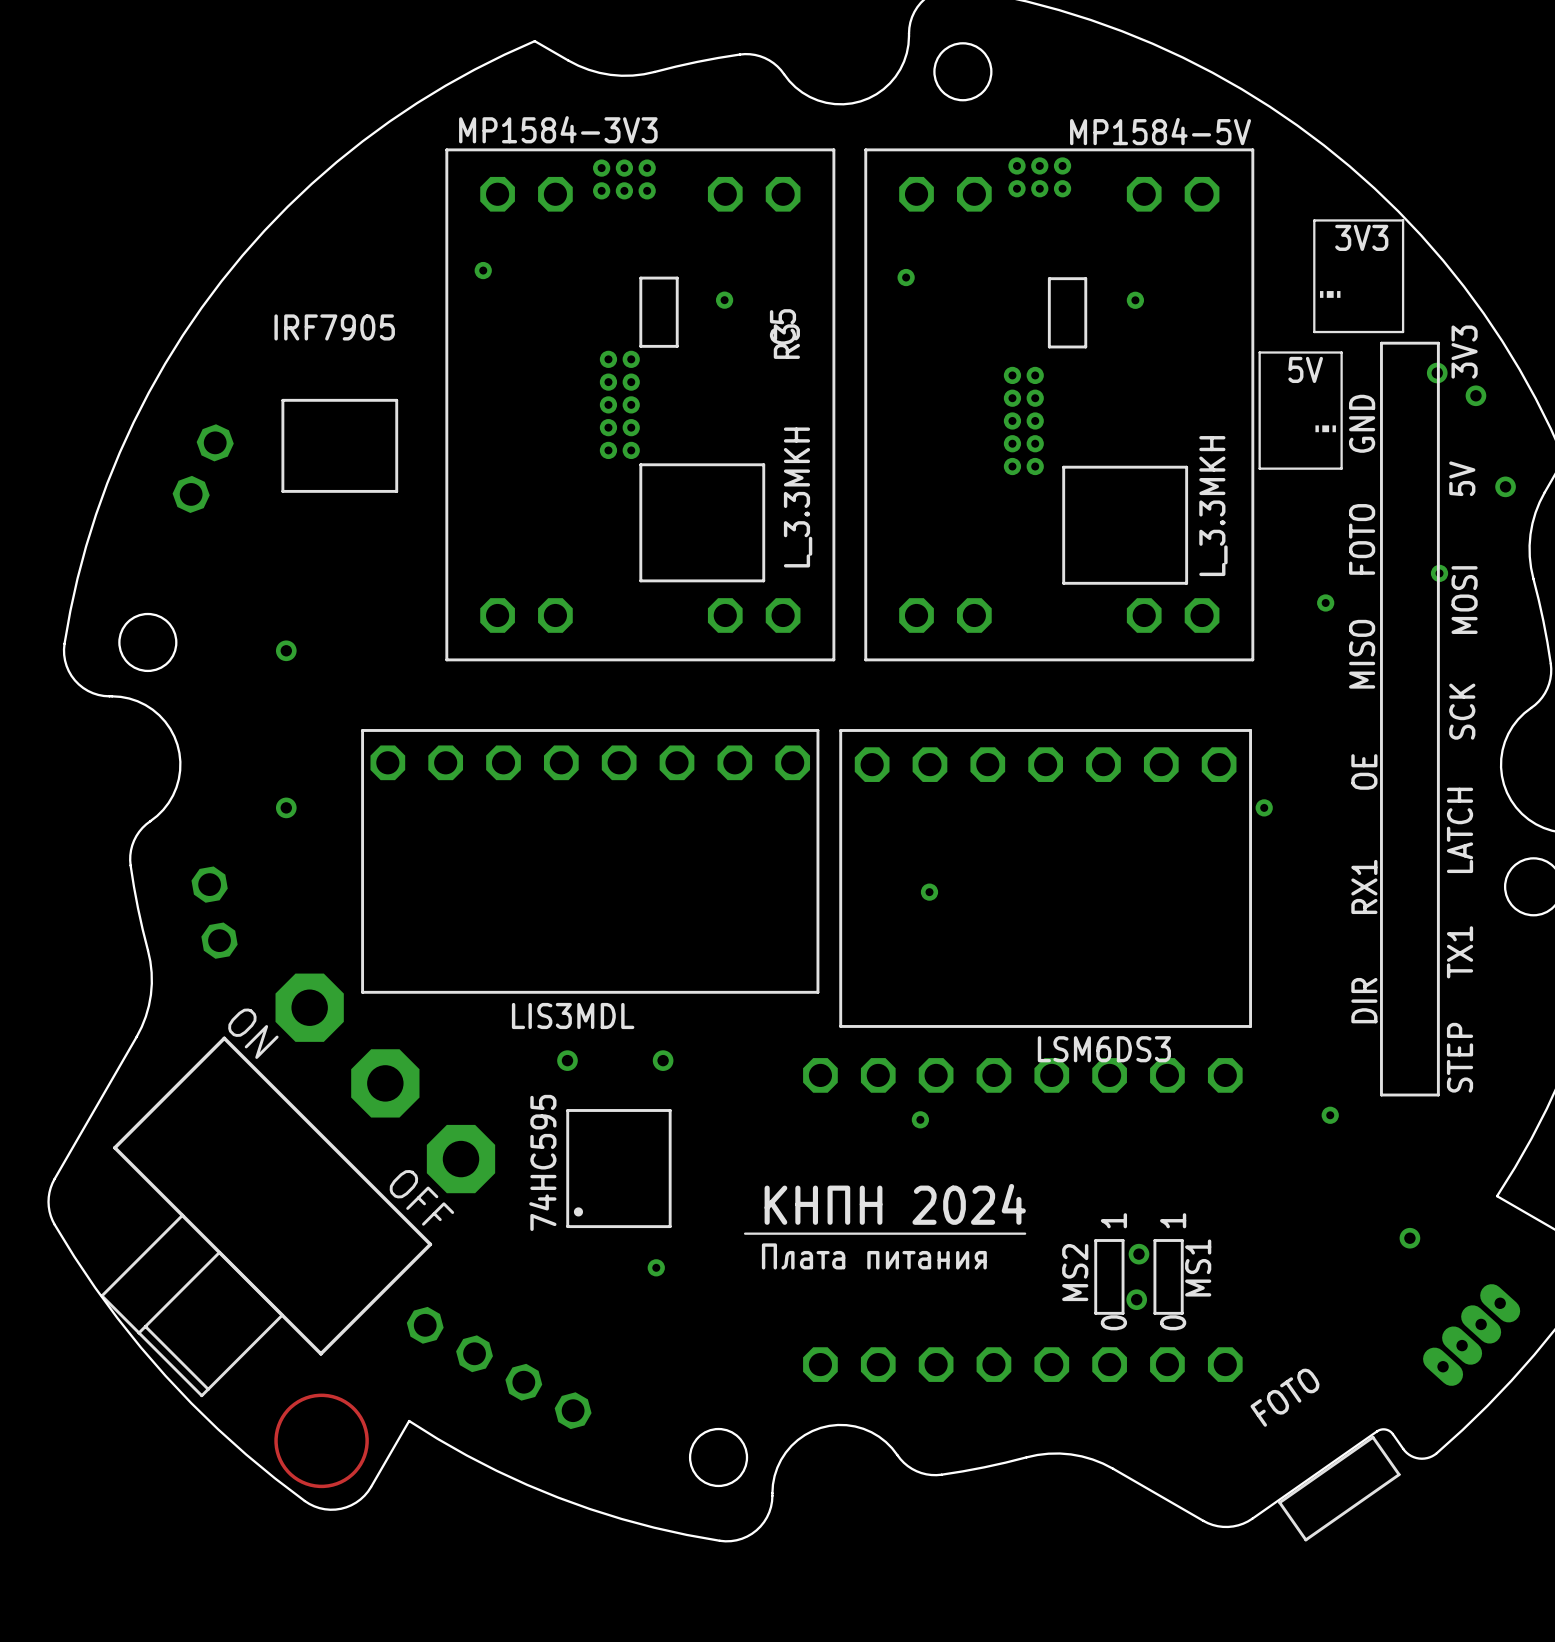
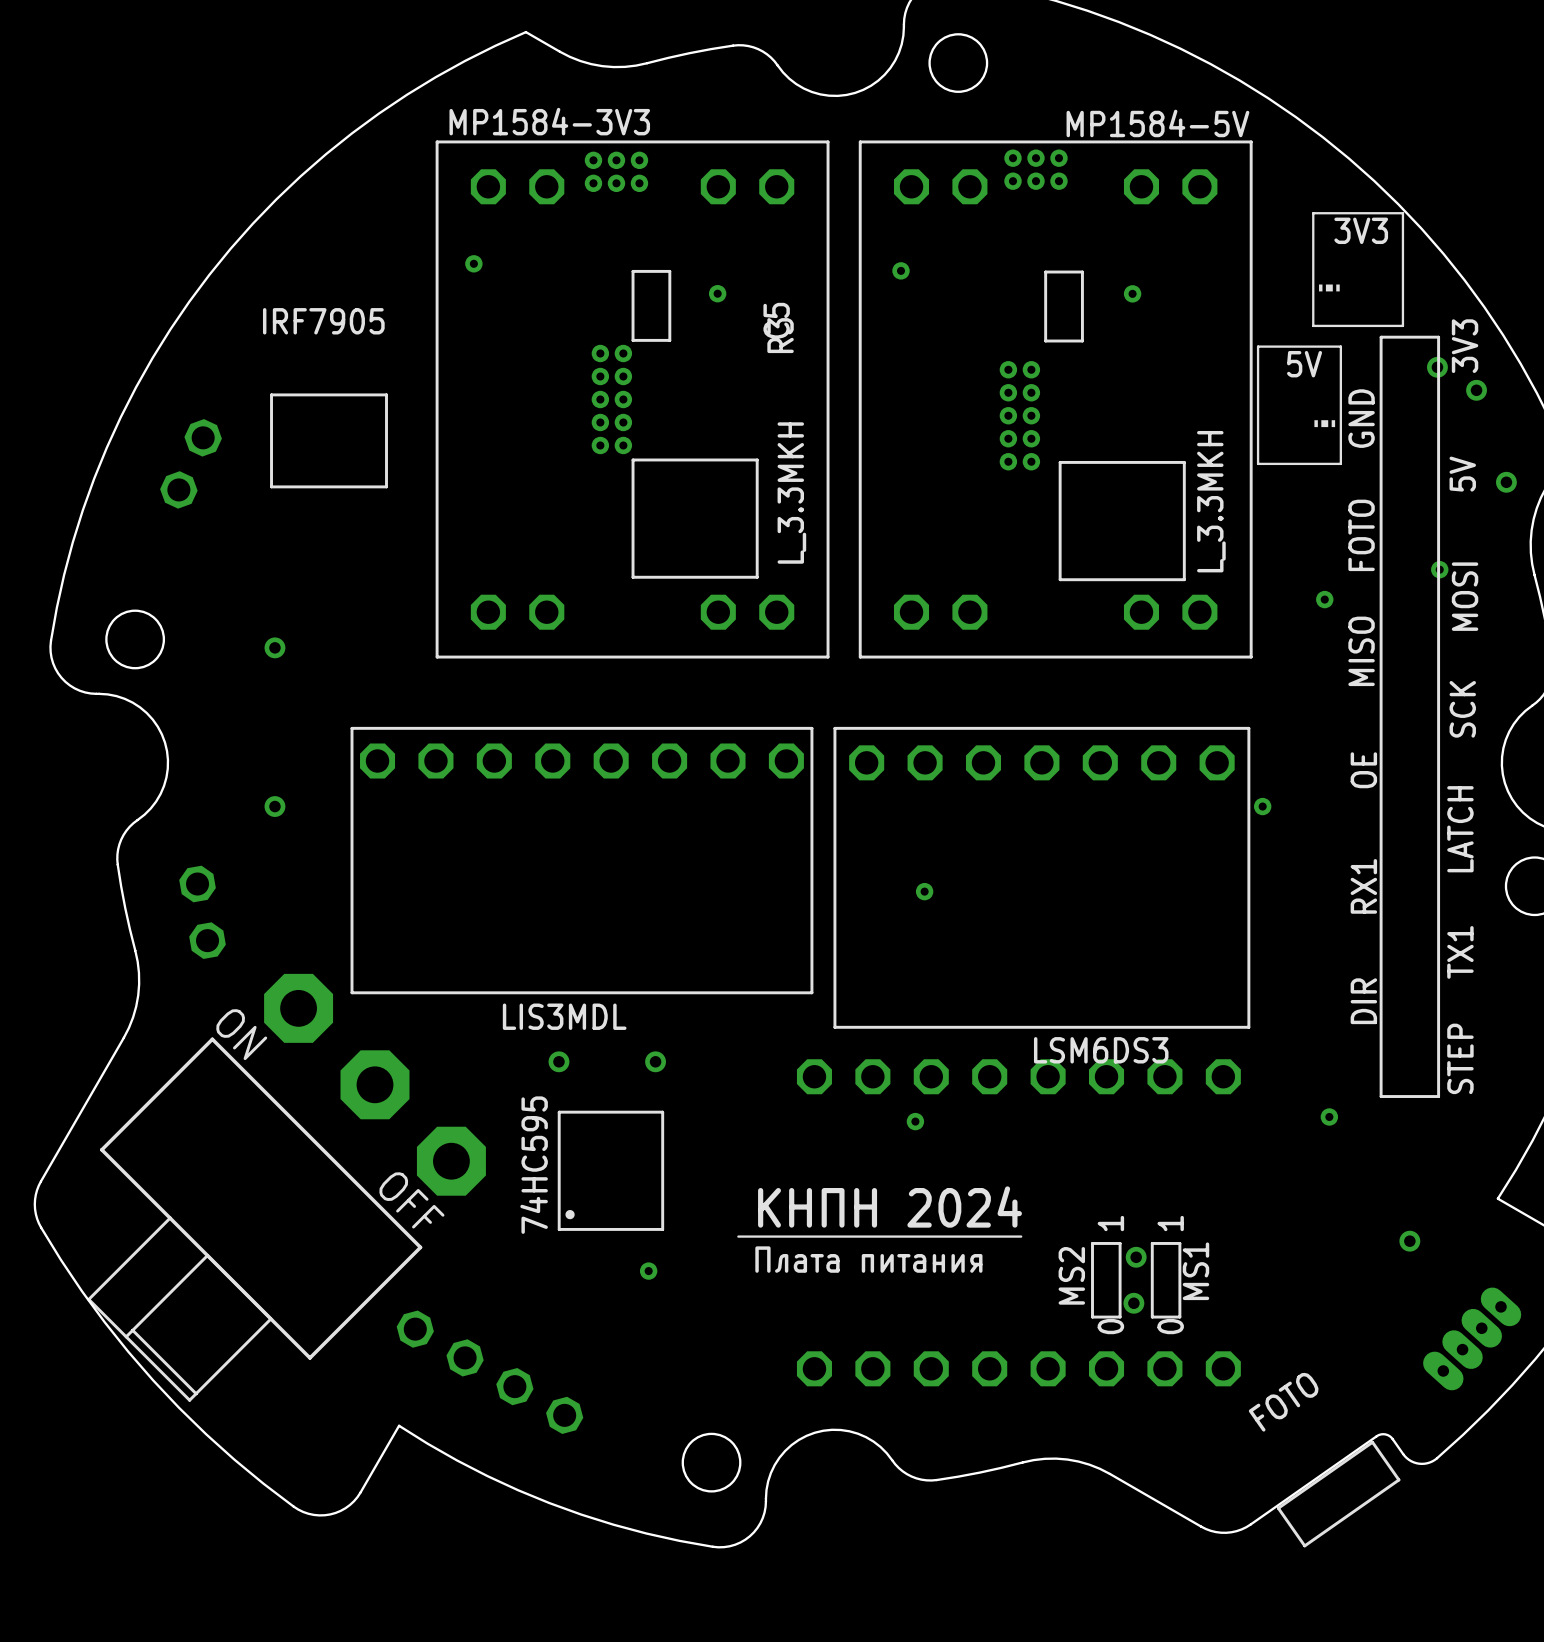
drawing: [274, 1393, 369, 1489] -> none

